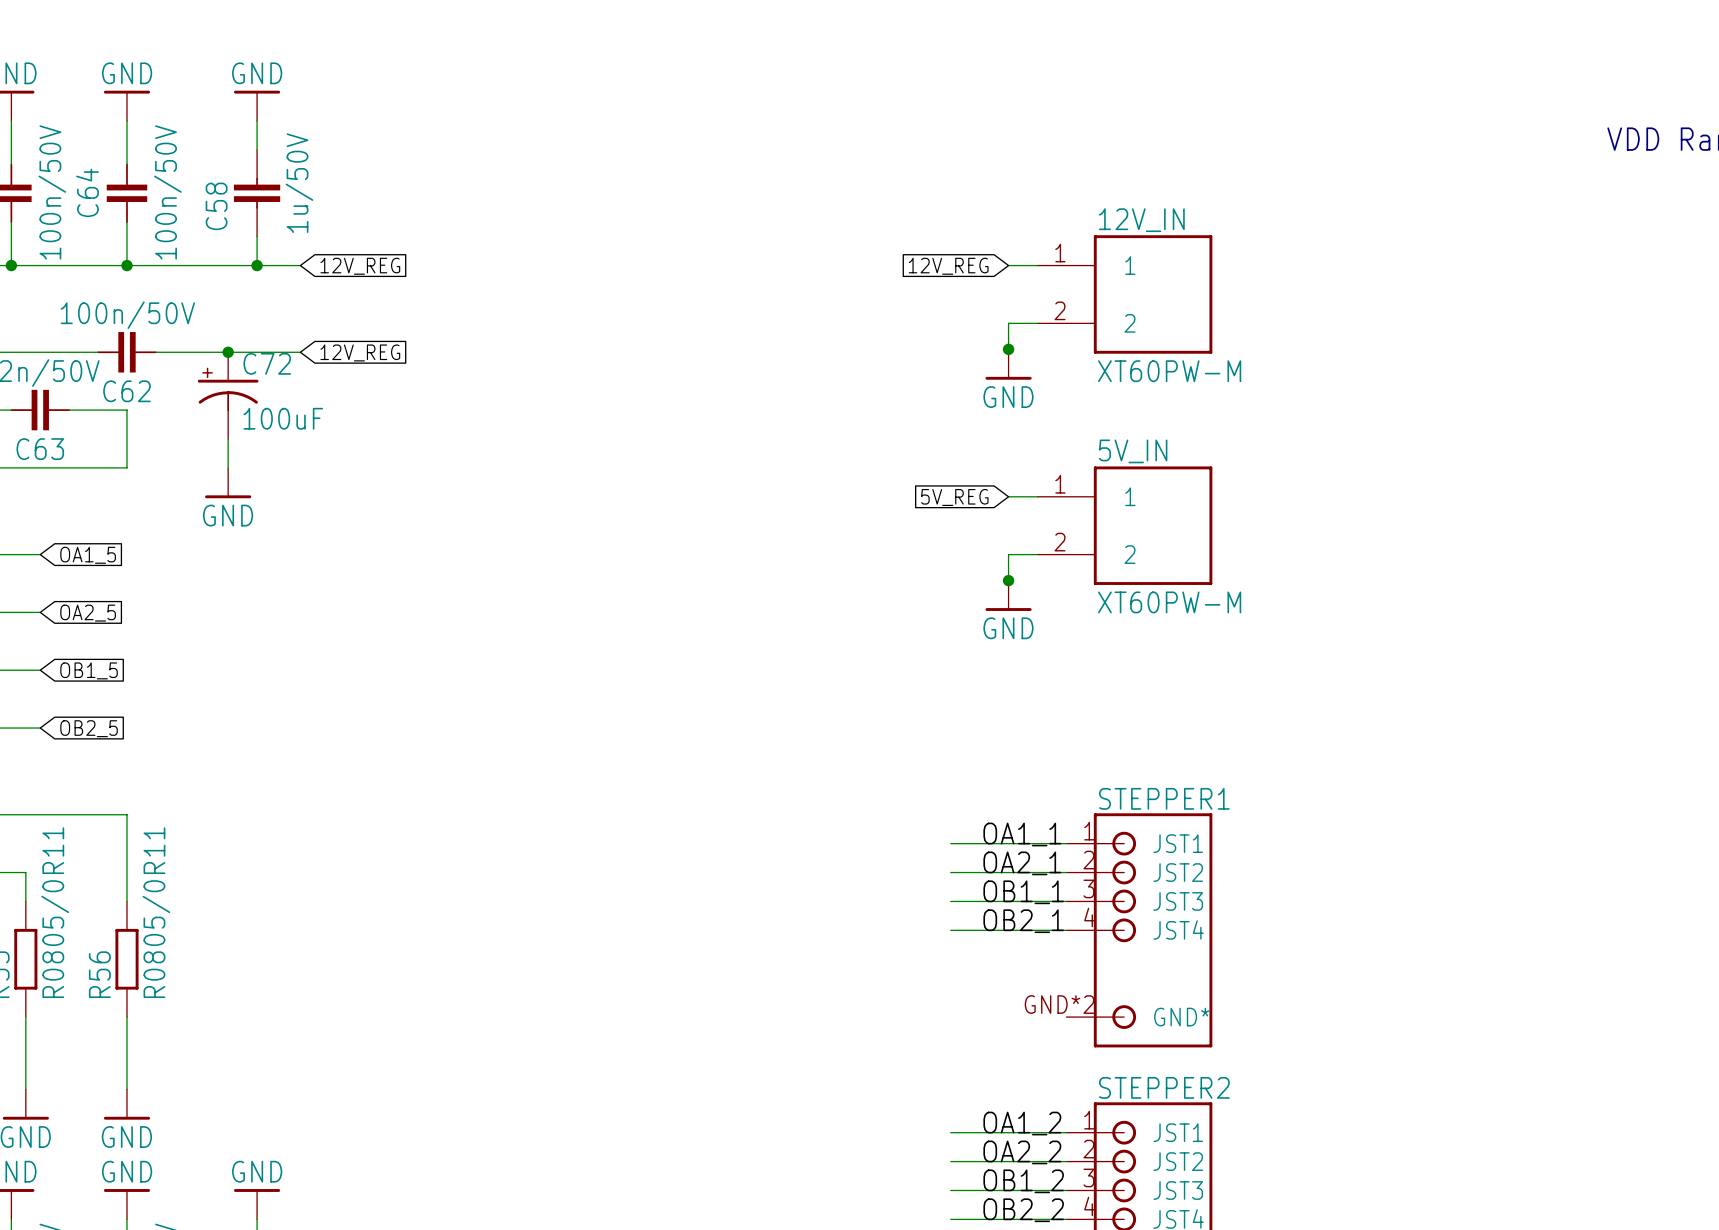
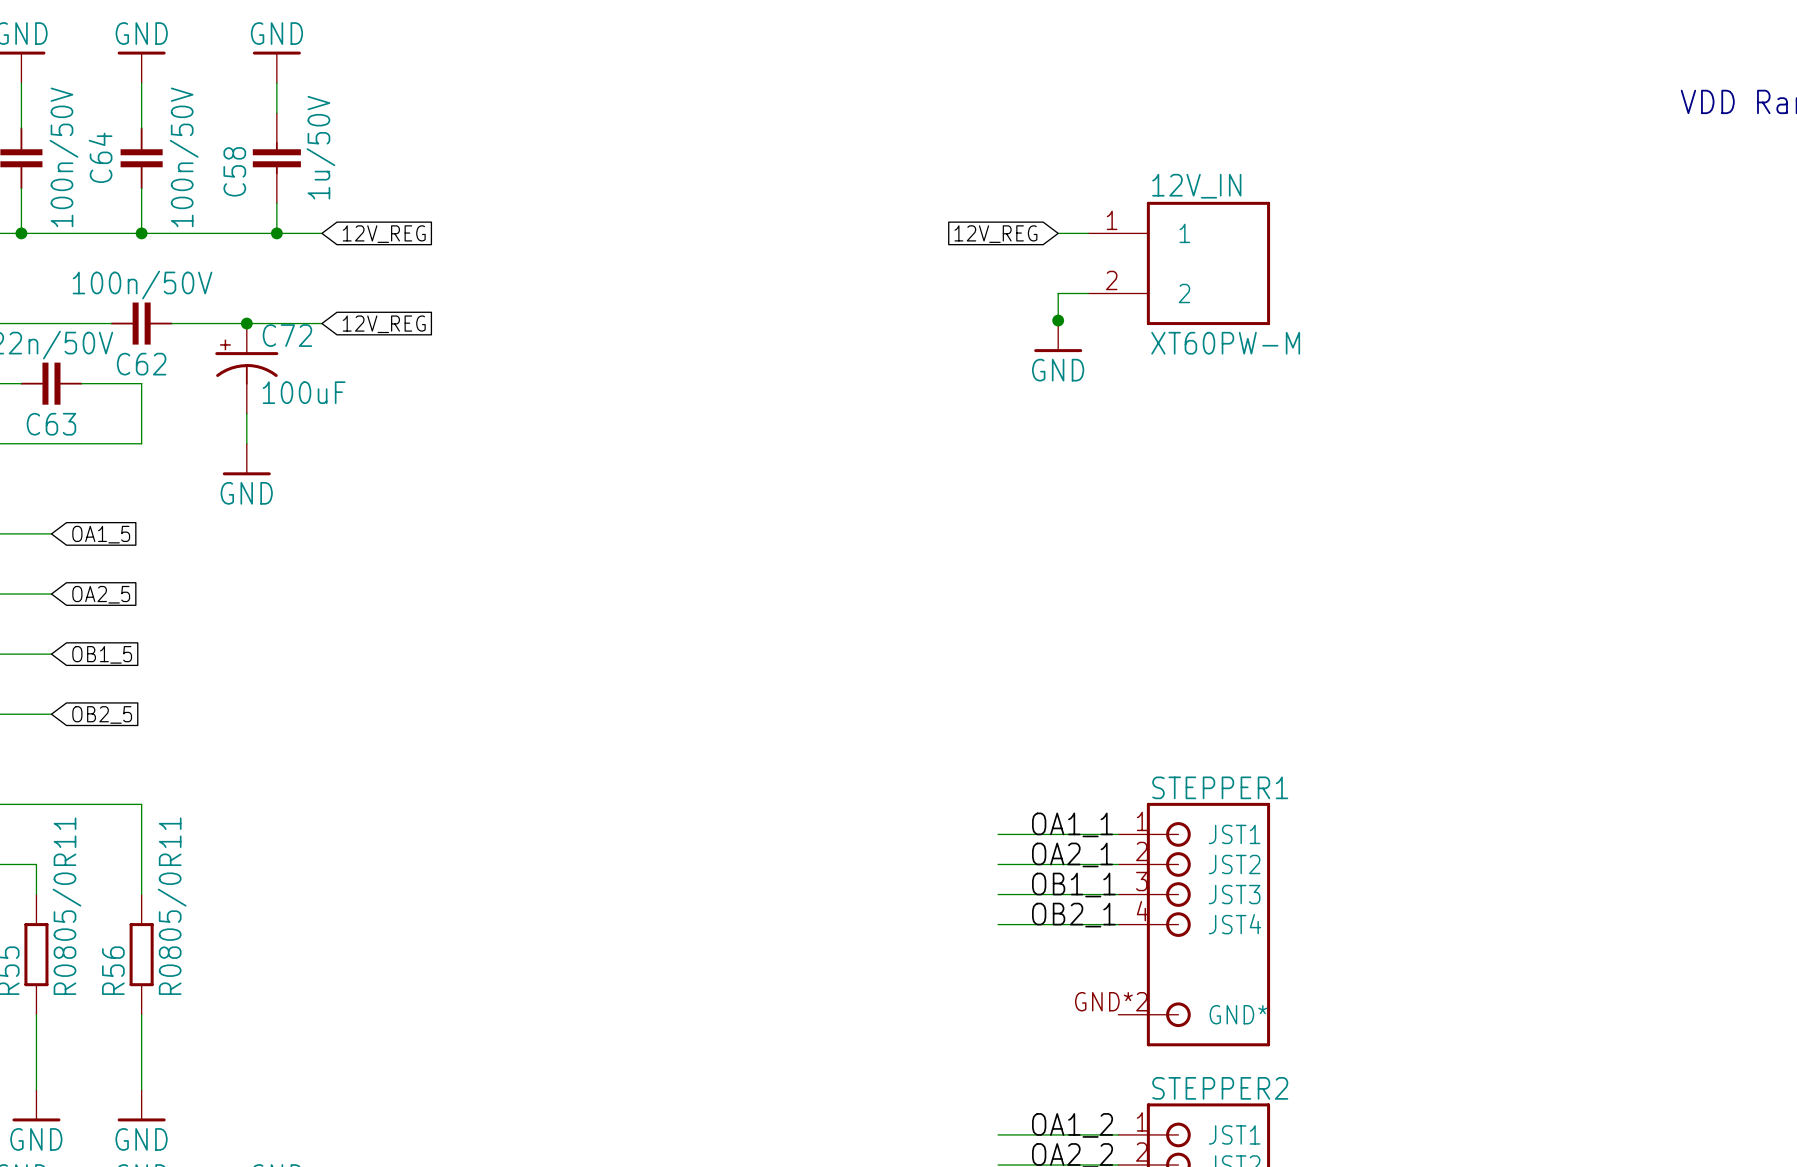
wire: (1008, 496) (1037, 496) -> none
global label: 5V_REG (954, 497) -> none
5V_IN: XT60PW-M (1124, 525) -> none
wire: (1037, 554) (1008, 554) (1008, 583) -> none
junction: (1008, 580) -> none
power symbol: GND (1008, 595) -> none

